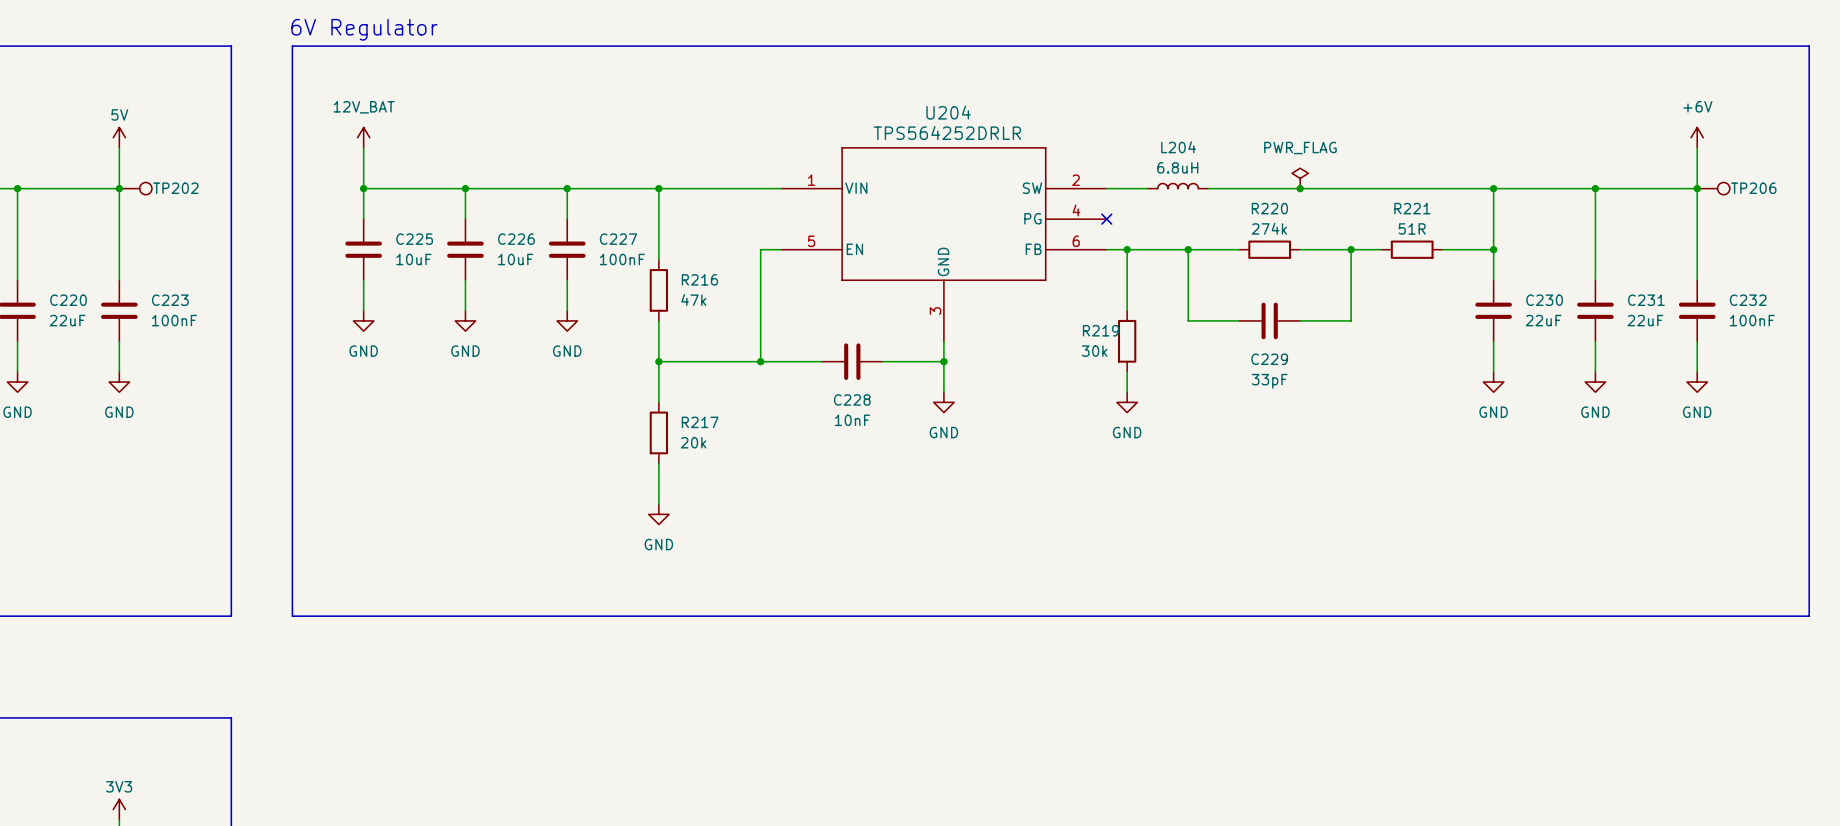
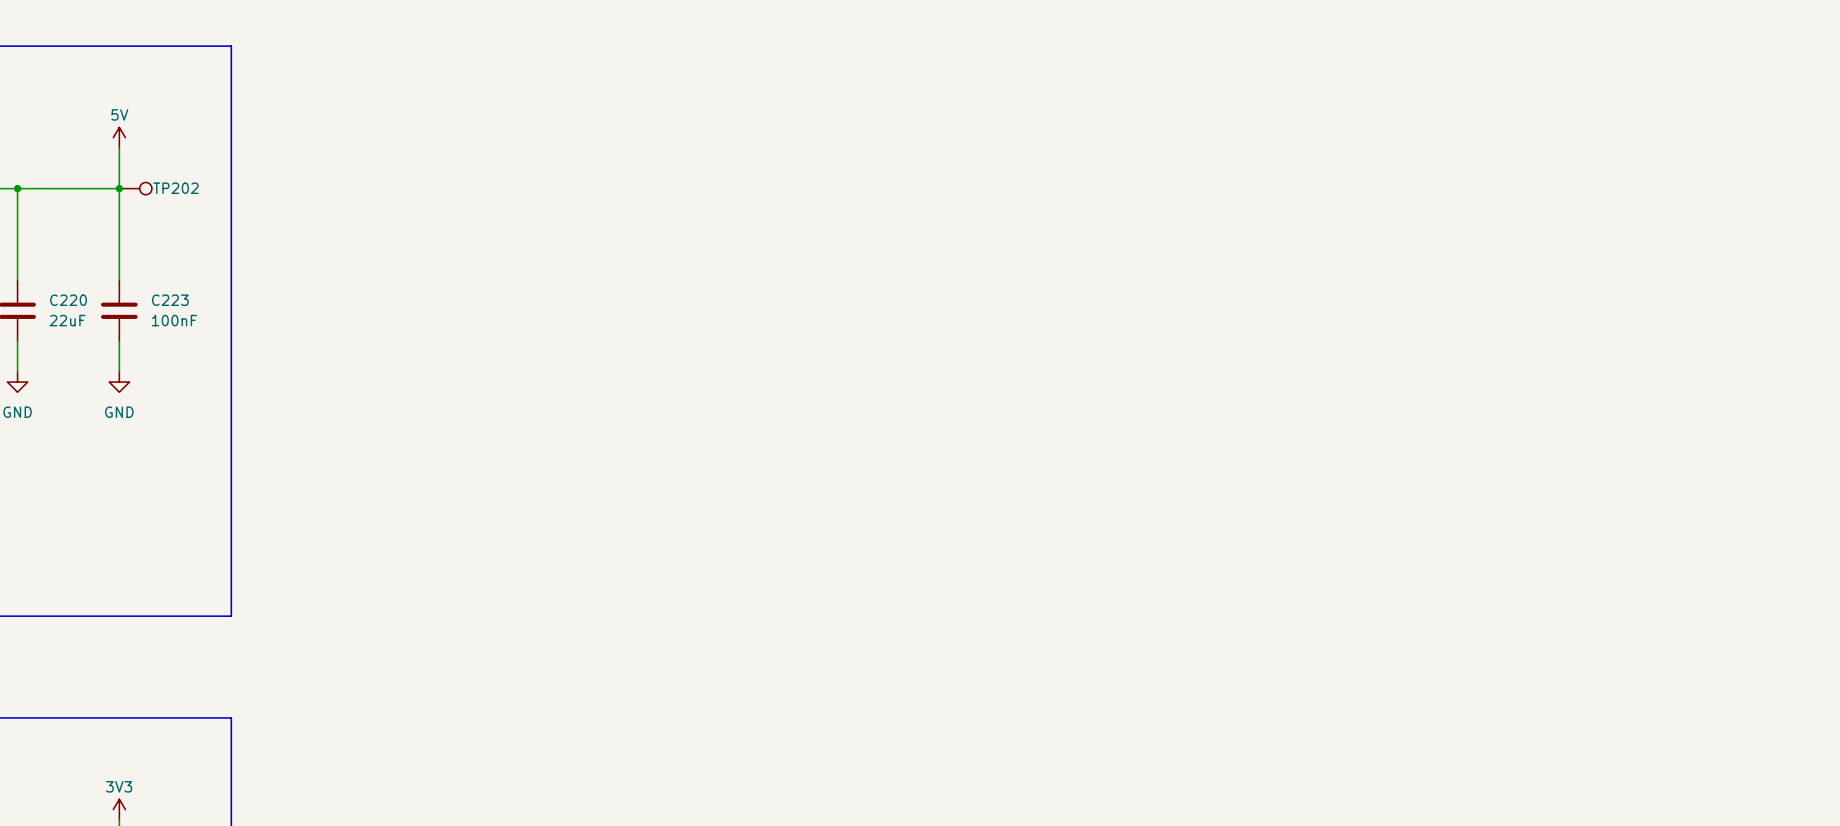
text: 6V Regulator (364, 29) -> none
line: (292, 46) (1809, 46) (1809, 616) (292, 616) (292, 46) -> none
power symbol: 12V_BAT (363, 137) -> none
power symbol: +6V (1697, 137) -> none
wire: (363, 147) (363, 219) -> none
wire: (1697, 147) (1697, 280) -> none
power symbol: PWR_FLAG (1300, 178) -> none
L204: 6.8uH (1178, 186) -> none
wire: (363, 188) (781, 188) -> none
junction: (363, 188) -> none
wire: (465, 188) (465, 219) -> none
junction: (465, 188) -> none
wire: (567, 188) (567, 219) -> none
junction: (567, 188) -> none
wire: (658, 188) (658, 259) -> none
junction: (658, 188) -> none
wire: (1106, 188) (1147, 188) -> none
wire: (1208, 188) (1697, 188) -> none
junction: (1300, 188) -> none
wire: (1493, 188) (1493, 280) -> none
junction: (1493, 188) -> none
wire: (1595, 188) (1595, 280) -> none
junction: (1595, 188) -> none
junction: (1697, 188) -> none
TP206: (1713, 188) -> none
no-connect mark: (1106, 219) -> none
U204: TPS564252DRLR (943, 244) -> none
C225: 10uF (363, 249) -> none
C226: 10uF (465, 249) -> none
C227: 100nF (567, 249) -> none
wire: (781, 249) (760, 249) (760, 361) -> none
wire: (1106, 249) (1239, 249) -> none
wire: (1127, 249) (1127, 310) -> none
junction: (1127, 249) -> none
wire: (1188, 249) (1188, 320) (1239, 320) -> none
junction: (1188, 249) -> none
R220: 274k (1269, 249) -> none
wire: (1300, 249) (1381, 249) -> none
wire: (1351, 249) (1351, 320) (1300, 320) -> none
junction: (1351, 249) -> none
R221: 51R (1412, 249) -> none
wire: (1442, 249) (1493, 249) -> none
junction: (1493, 249) -> none
wire: (363, 280) (363, 310) -> none
wire: (465, 280) (465, 310) -> none
wire: (567, 280) (567, 310) -> none
R216: 47k (658, 290) -> none
C230: 22uF (1493, 310) -> none
C231: 22uF (1595, 310) -> none
C232: 100nF (1697, 310) -> none
power symbol: GND (363, 320) -> none
power symbol: GND (465, 320) -> none
power symbol: GND (567, 320) -> none
wire: (658, 320) (658, 402) -> none
C229: 33pF (1269, 320) -> none
wire: (943, 341) (943, 392) -> none
R219: 30k (1127, 341) -> none
wire: (1493, 341) (1493, 371) -> none
wire: (1595, 341) (1595, 371) -> none
wire: (1697, 341) (1697, 371) -> none
wire: (658, 361) (821, 361) -> none
junction: (658, 361) -> none
junction: (760, 361) -> none
C228: 10nF (852, 361) -> none
wire: (882, 361) (943, 361) -> none
junction: (943, 361) -> none
wire: (1127, 371) (1127, 392) -> none
power symbol: GND (1493, 382) -> none
power symbol: GND (1595, 382) -> none
power symbol: GND (1697, 382) -> none
power symbol: GND (943, 402) -> none
power symbol: GND (1127, 402) -> none
R217: 20k (658, 432) -> none
wire: (658, 463) (658, 504) -> none
power symbol: GND (658, 514) -> none

